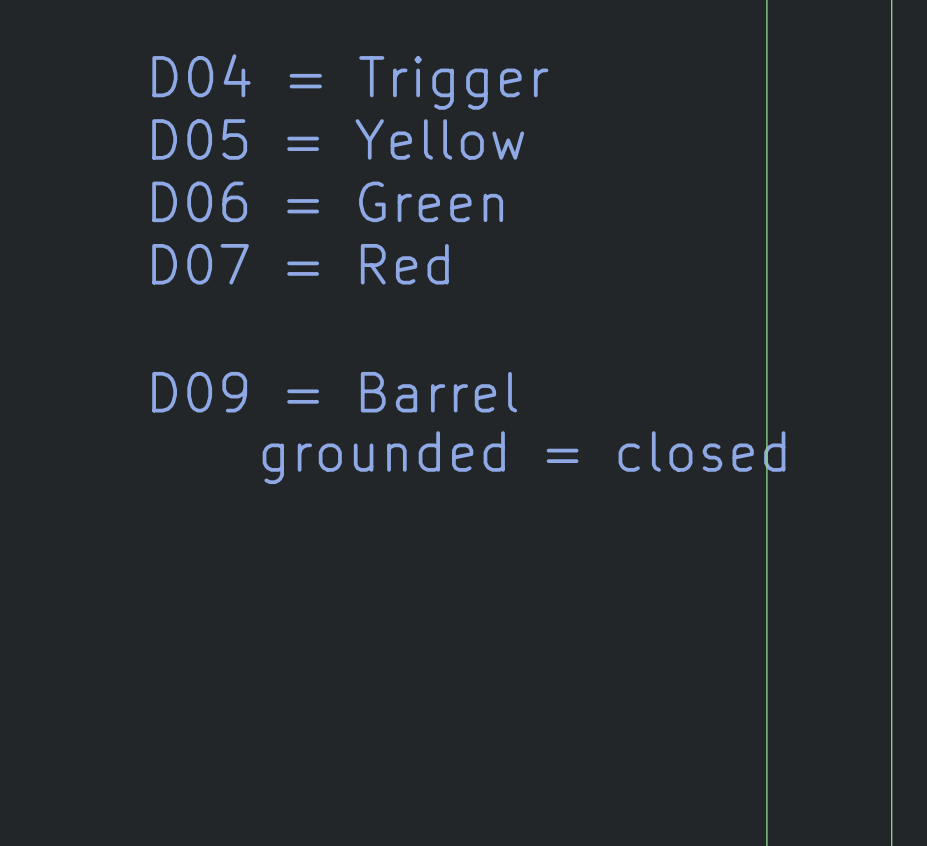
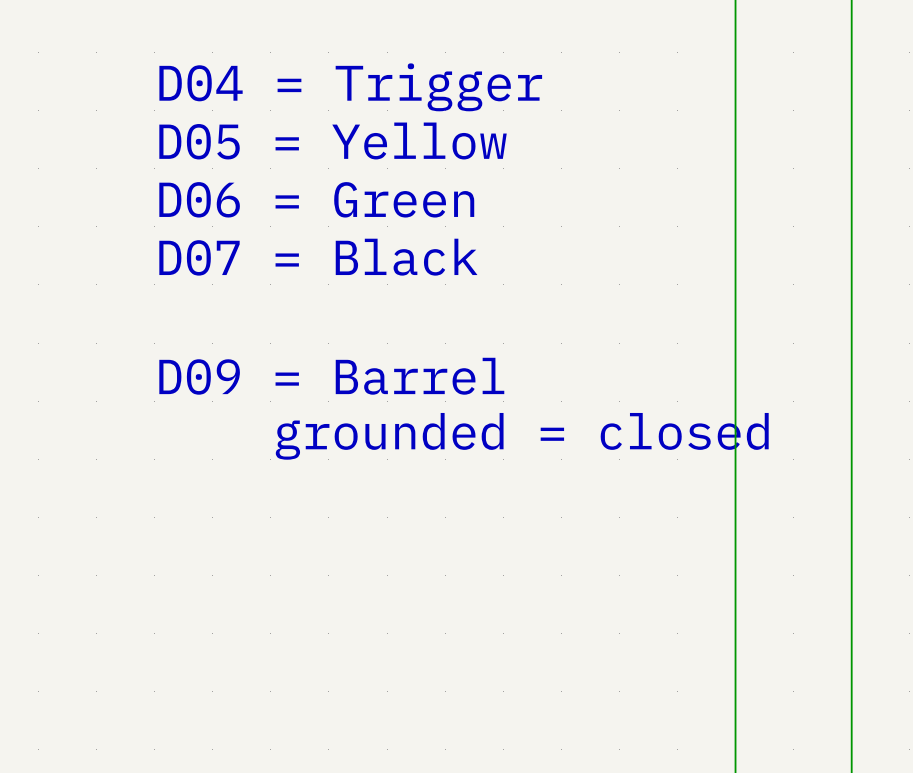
text: D07 = Red (300, 264) -> D07 = Black (318, 257)

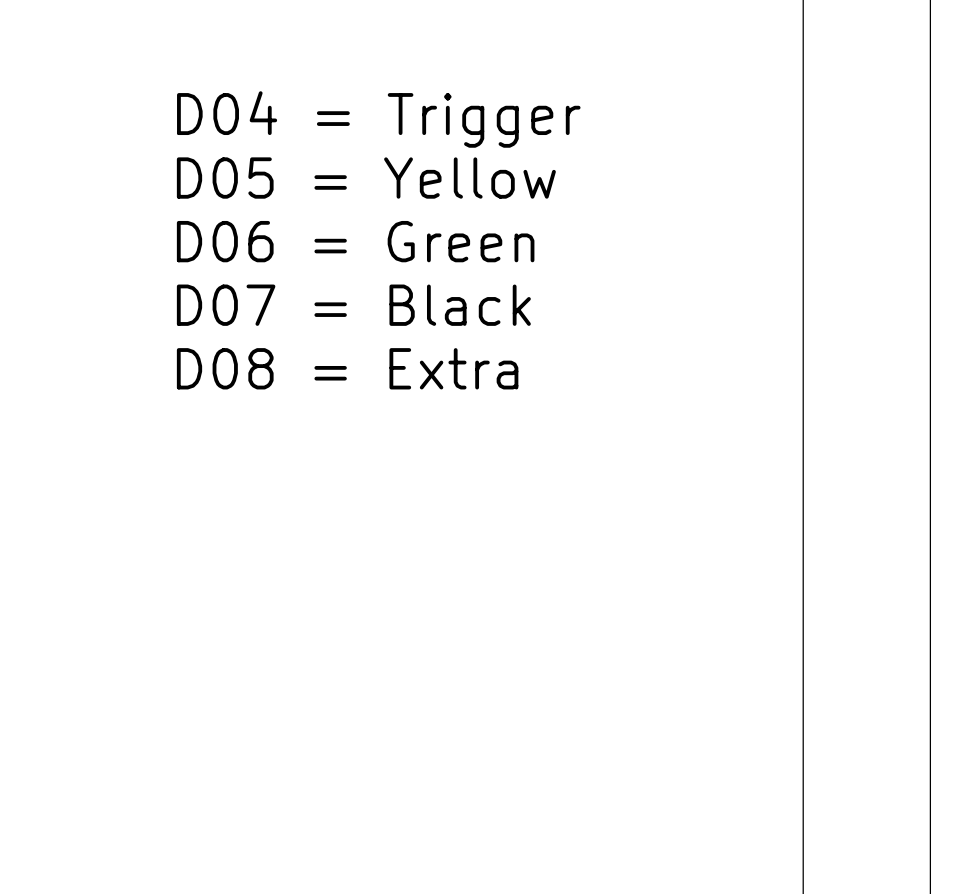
text: none -> D08 = Extra (347, 368)
text: D09 = Barrel (331, 376) -> none
text: grounded = closed (522, 436) -> none

